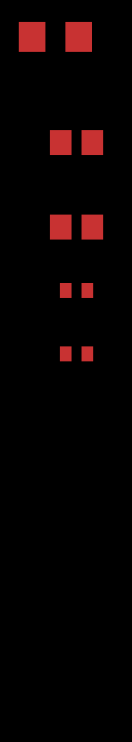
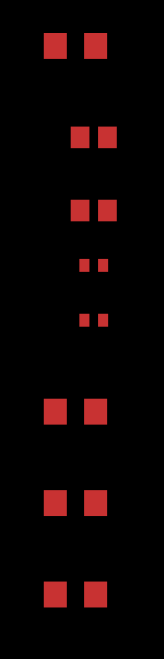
part: none -> (75, 411)
part: none -> (75, 503)
part: none -> (75, 594)

